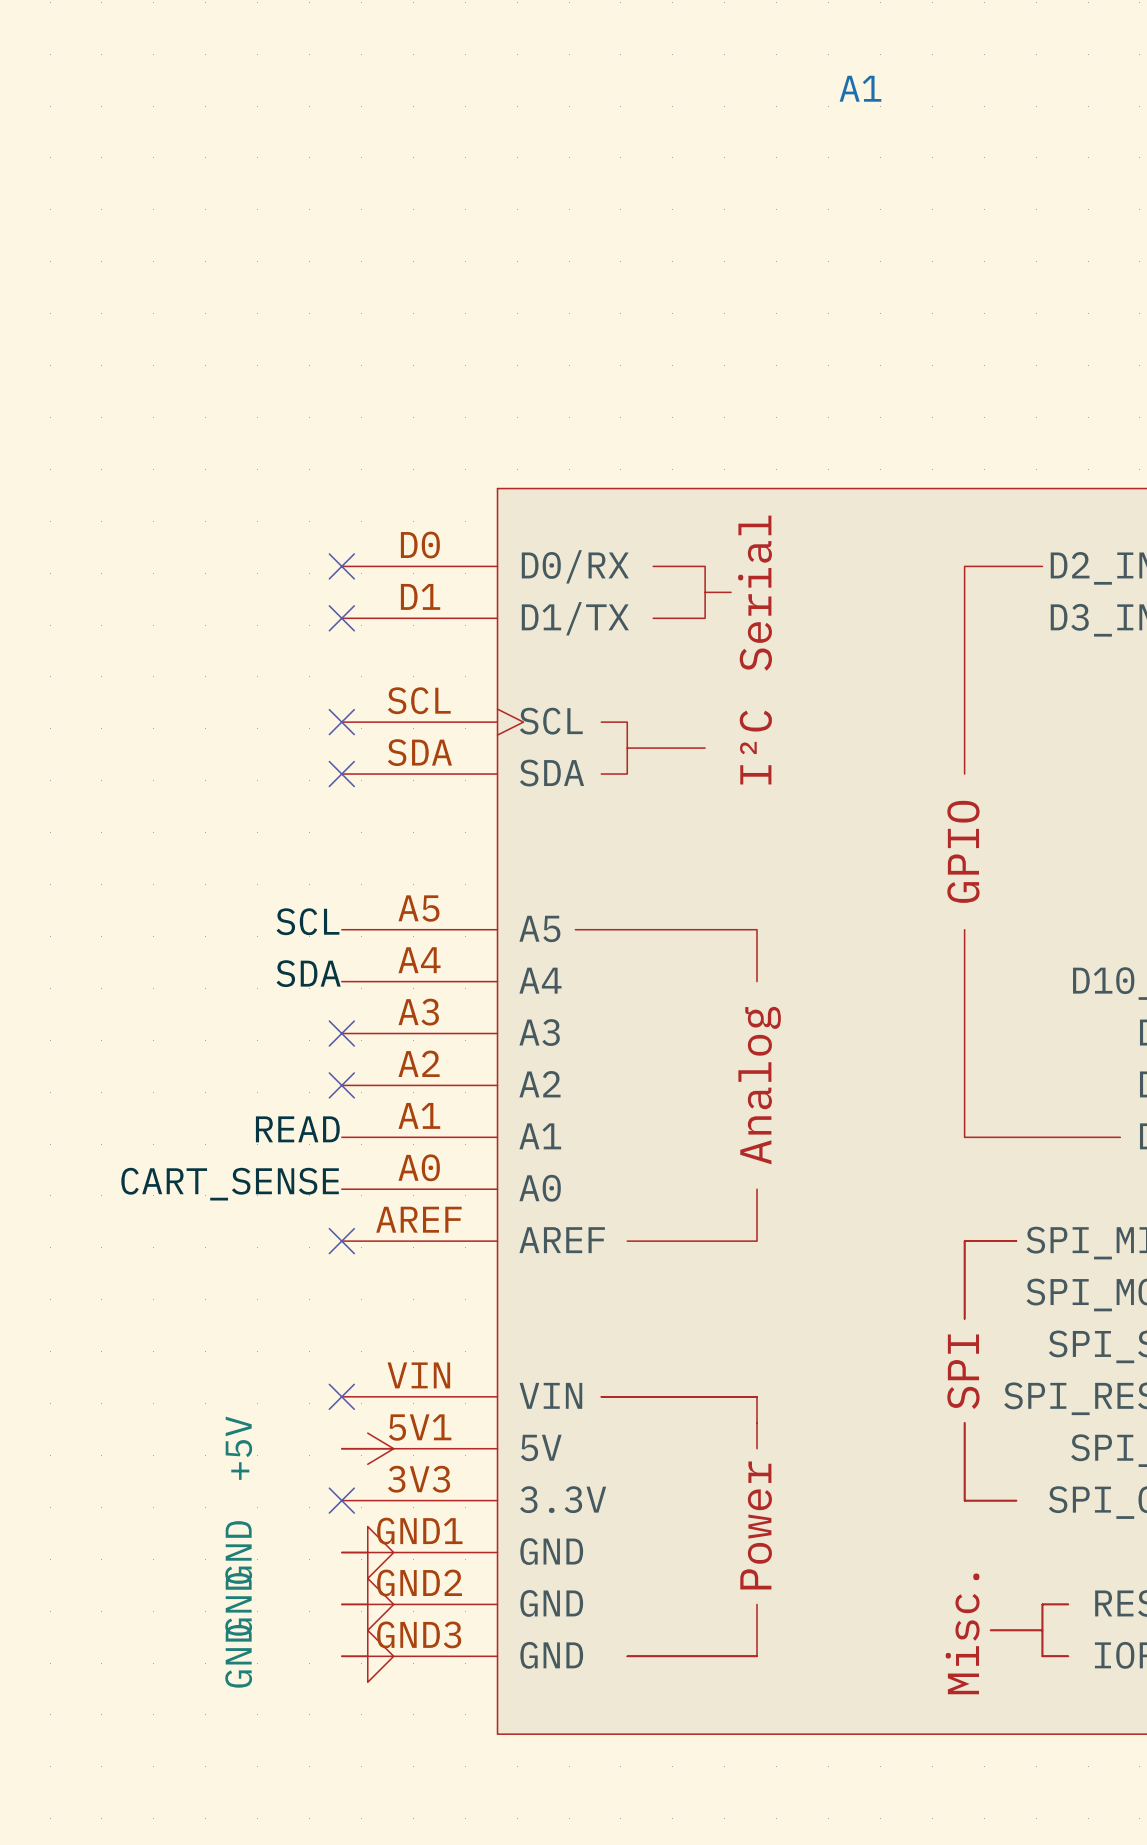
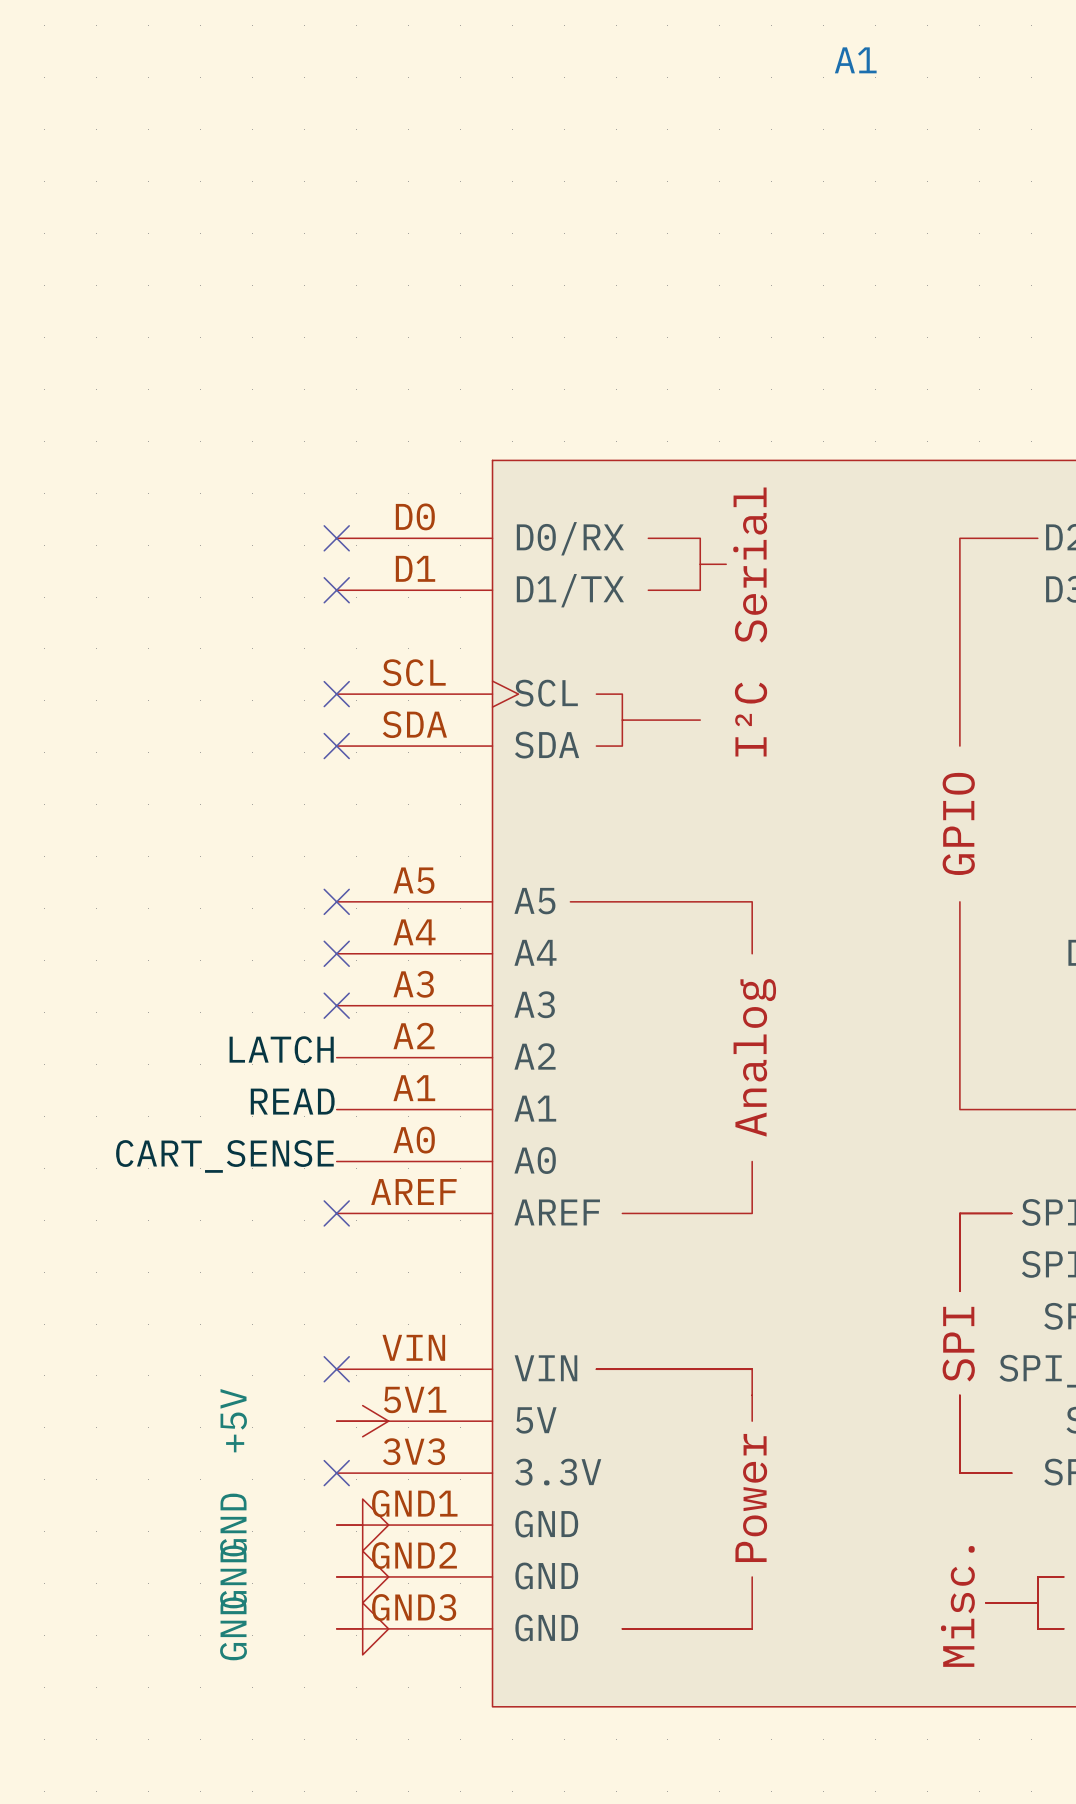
label: SCL (307, 921) -> none
no-connect mark: none -> (336, 901)
label: SDA (308, 973) -> none
no-connect mark: none -> (336, 953)
label: none -> LATCH (281, 1049)
no-connect mark: (341, 1085) -> none

